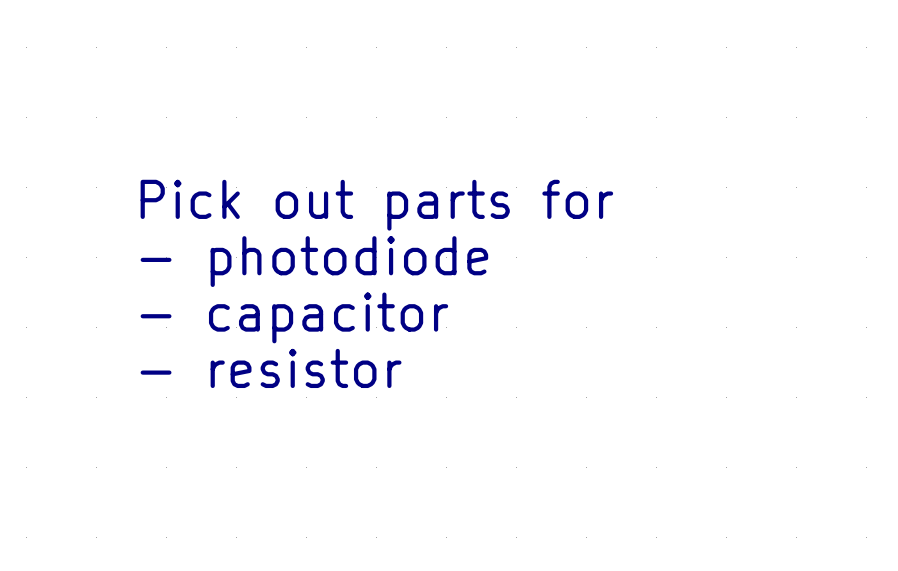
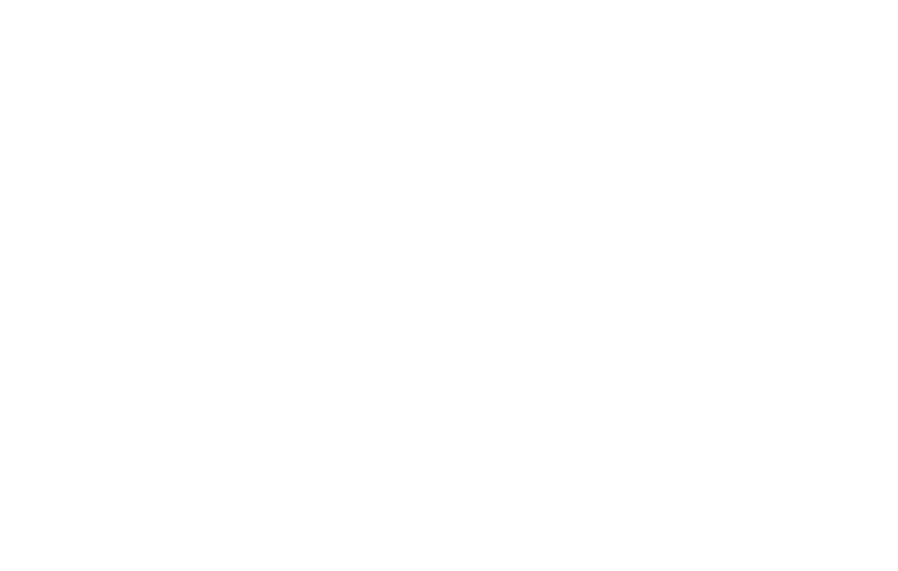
text: Pick out parts for (376, 205) -> none
text: - photodiode (314, 261) -> none
text: - capacitor (294, 317) -> none
text: - resistor (271, 368) -> none

